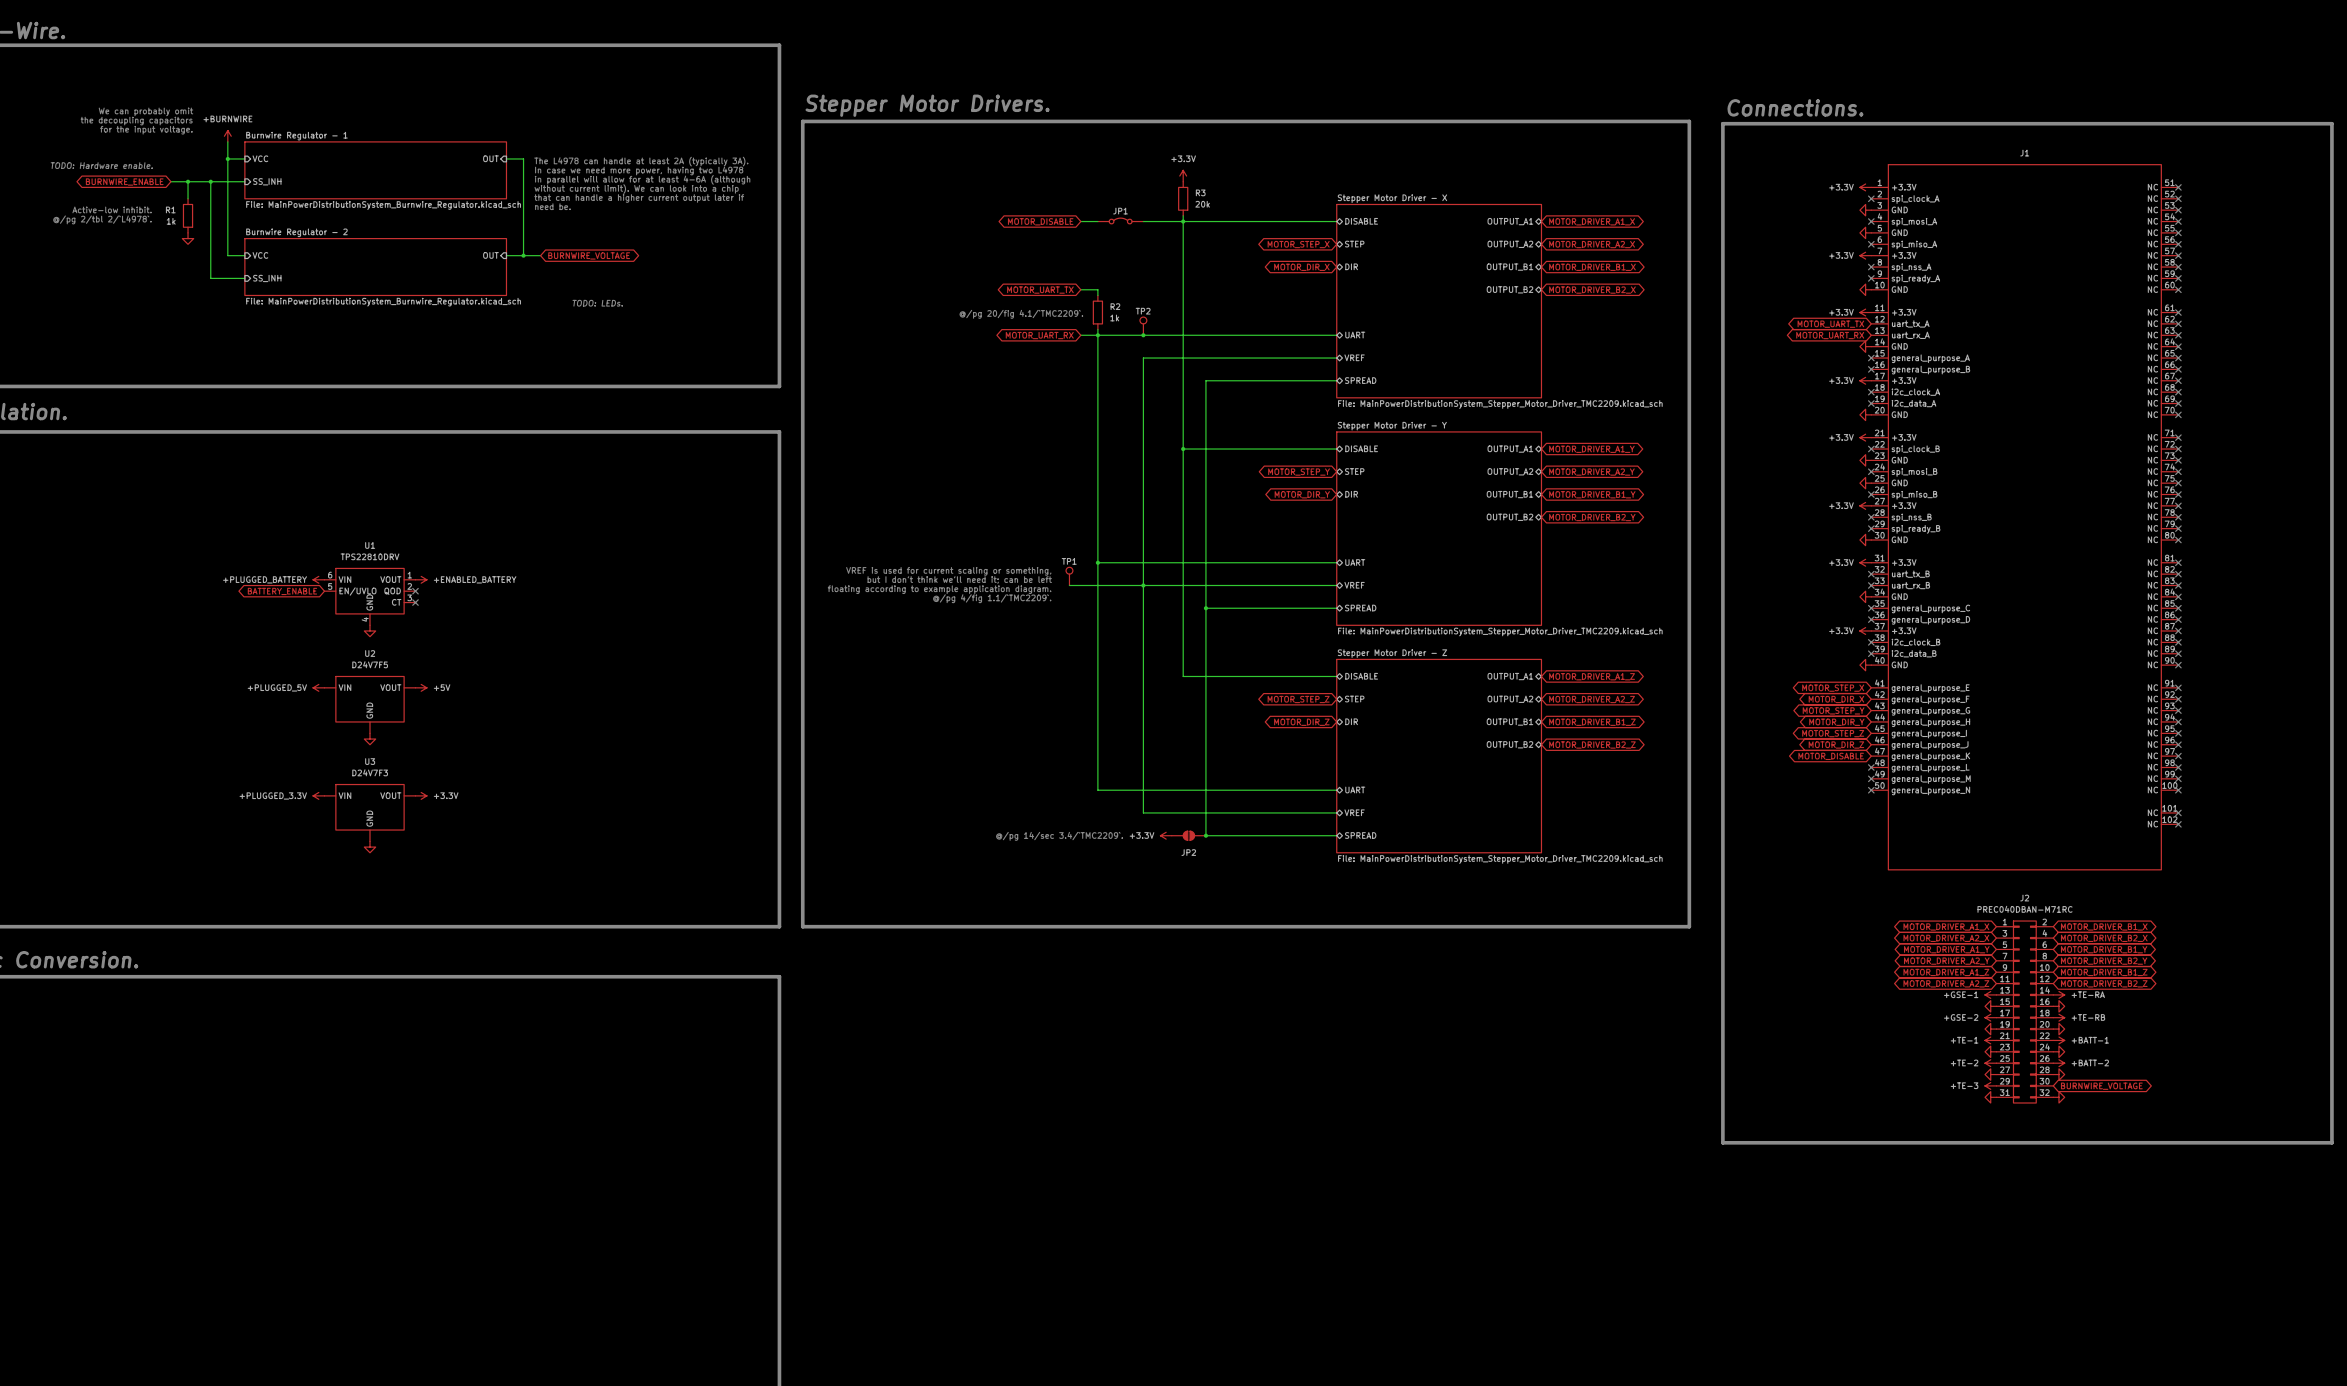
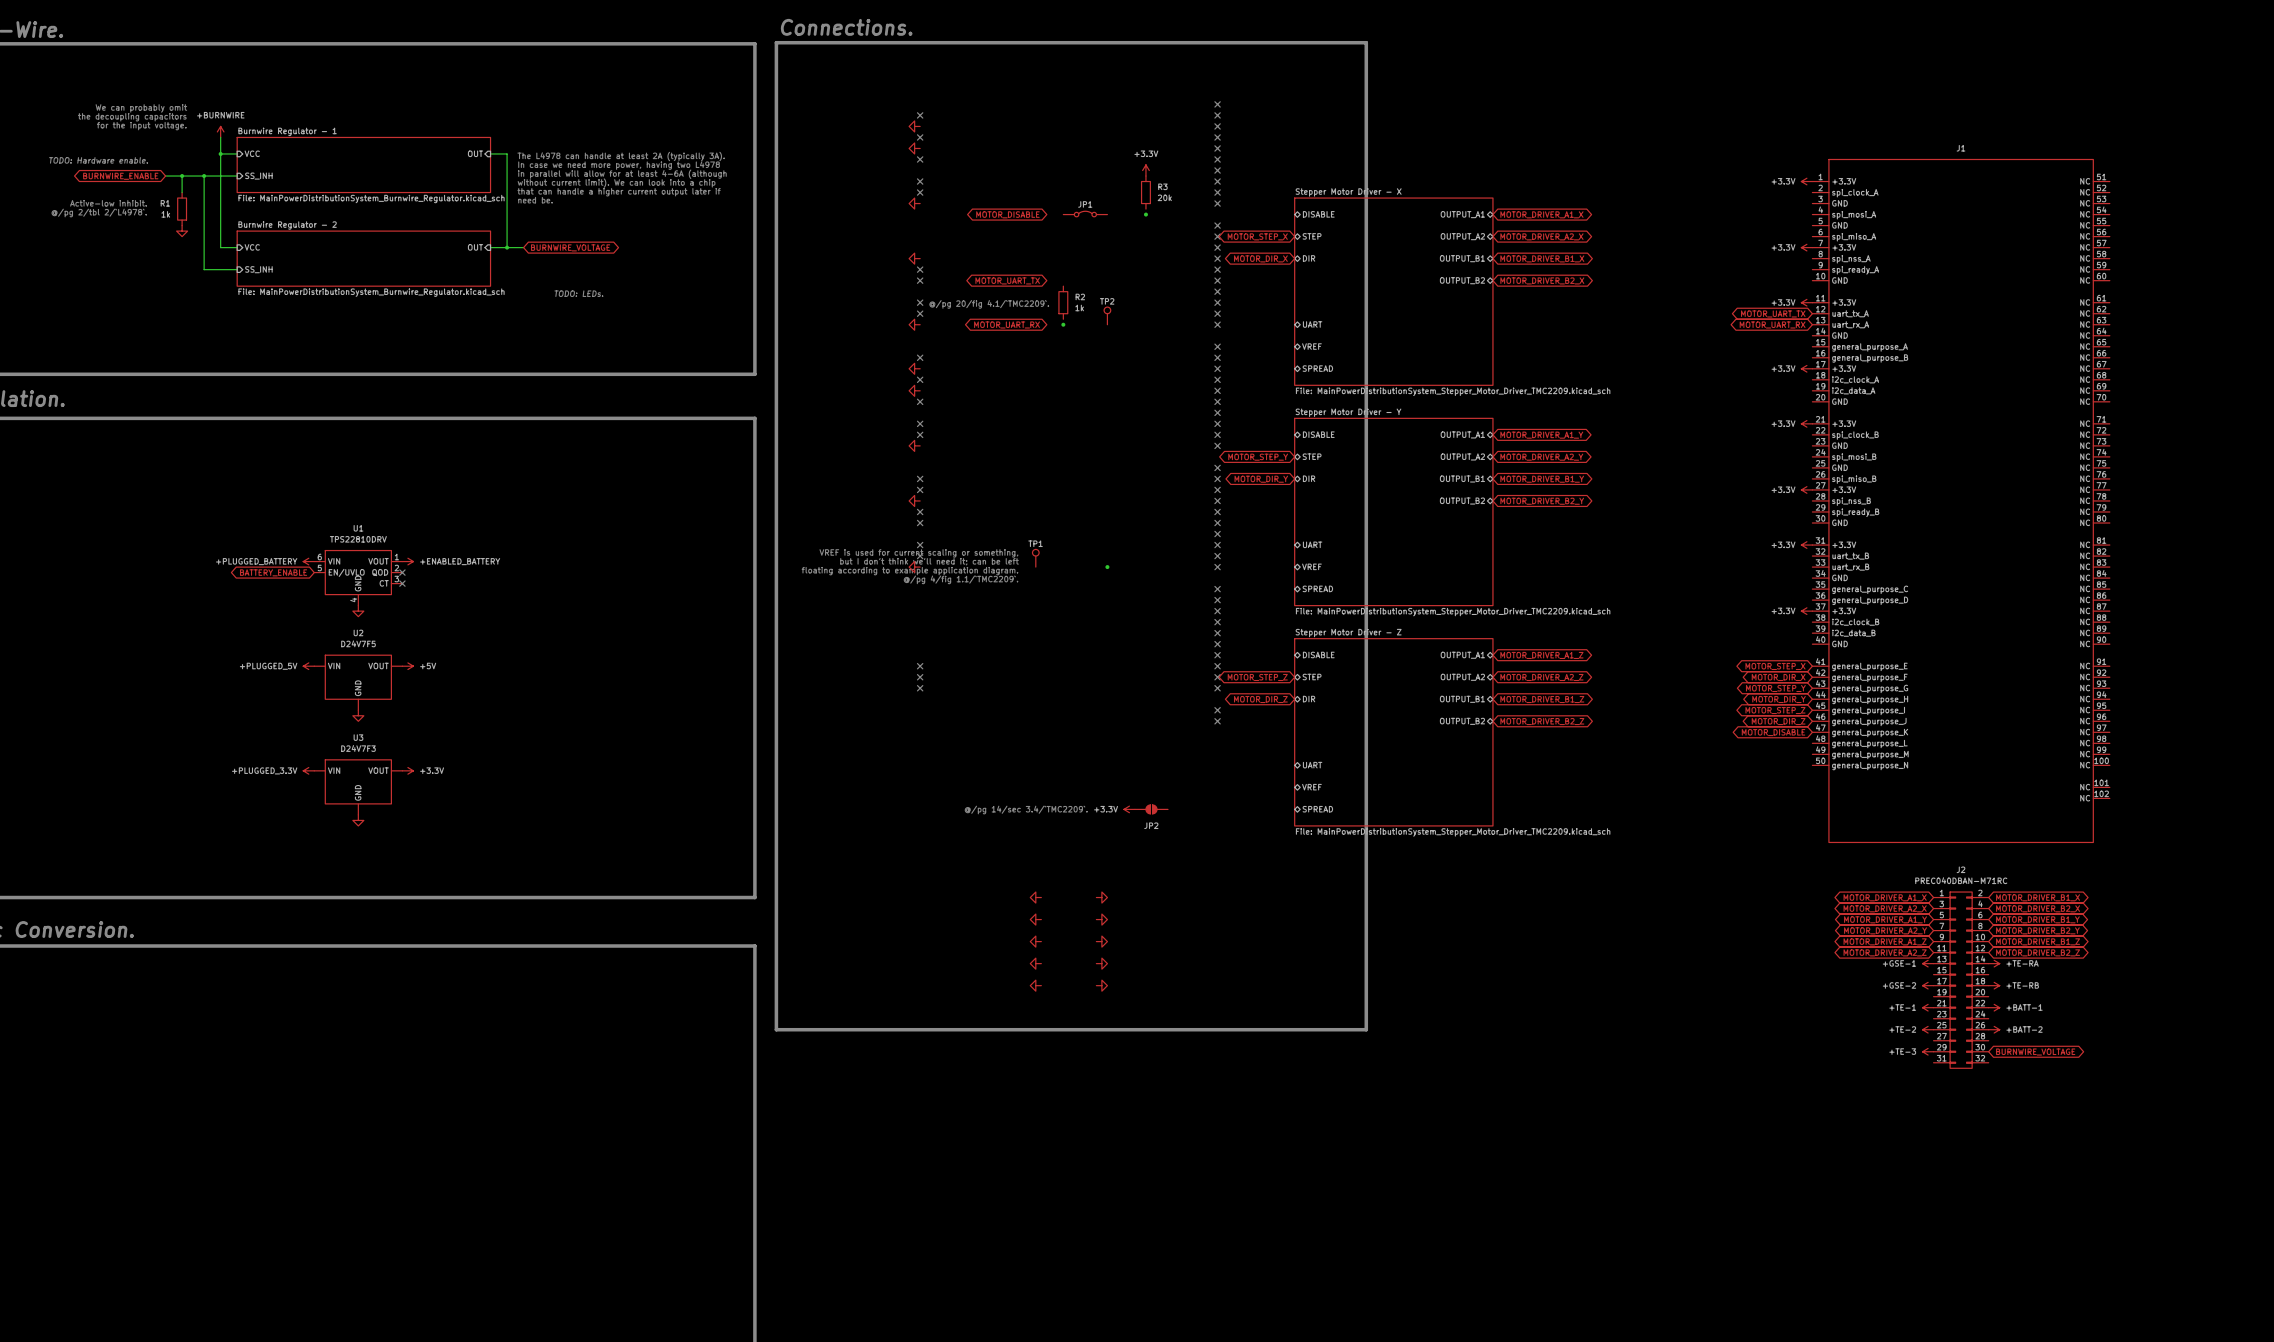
text: none -> Connections. (846, 27)
text: Stepper Motor Drivers. (927, 105) -> none
no-connect mark: none -> (1217, 104)
text: Connections. (1795, 107) -> none
no-connect mark: none -> (920, 115)
no-connect mark: none -> (1217, 115)
line: (802, 121) (1689, 121) (1689, 926) (802, 926) (802, 121) -> (776, 42) (776, 1029) (1366, 1029) (1366, 42) (776, 42)
line: (1722, 123) (2331, 123) (2331, 1142) (1722, 1142) (1722, 123) -> none
power symbol: none -> (914, 126)
no-connect mark: none -> (1217, 126)
no-connect mark: none -> (920, 137)
no-connect mark: none -> (1217, 137)
power symbol: none -> (914, 148)
no-connect mark: none -> (1217, 148)
no-connect mark: none -> (920, 159)
no-connect mark: none -> (1217, 159)
no-connect mark: none -> (1217, 170)
no-connect mark: none -> (920, 181)
no-connect mark: none -> (1217, 181)
no-connect mark: (2178, 187) -> none
no-connect mark: none -> (920, 192)
no-connect mark: none -> (1217, 192)
no-connect mark: (1871, 198) -> none
no-connect mark: (2178, 198) -> none
power symbol: none -> (914, 203)
no-connect mark: none -> (1217, 203)
power symbol: (1865, 210) -> none
no-connect mark: (2178, 210) -> none
wire: (1183, 215) (1183, 676) (1336, 676) -> none
wire: (1080, 221) (1097, 221) -> none
wire: (1143, 221) (1336, 221) -> none
no-connect mark: (1871, 221) -> none
no-connect mark: (2178, 221) -> none
no-connect mark: none -> (1217, 225)
power symbol: (1865, 232) -> none
no-connect mark: (2178, 232) -> none
no-connect mark: none -> (1217, 236)
no-connect mark: (1871, 244) -> none
no-connect mark: (2178, 244) -> none
no-connect mark: none -> (1217, 247)
no-connect mark: (2178, 255) -> none
power symbol: none -> (914, 258)
no-connect mark: none -> (1217, 258)
no-connect mark: (1871, 267) -> none
no-connect mark: (2178, 267) -> none
no-connect mark: none -> (920, 269)
no-connect mark: none -> (1217, 269)
no-connect mark: (1871, 278) -> none
no-connect mark: (2178, 278) -> none
no-connect mark: none -> (920, 280)
wire: (1080, 289) (1097, 289) (1097, 295) -> none
no-connect mark: none -> (1217, 280)
power symbol: (1865, 289) -> none
no-connect mark: (2178, 289) -> none
no-connect mark: none -> (1217, 291)
no-connect mark: none -> (920, 302)
no-connect mark: none -> (1217, 302)
no-connect mark: (2178, 312) -> none
no-connect mark: none -> (920, 313)
no-connect mark: none -> (1217, 313)
no-connect mark: (2178, 323) -> none
wire: (1097, 329) (1097, 790) (1336, 790) -> none
power symbol: none -> (914, 324)
wire: (1080, 335) (1336, 335) -> none
junction: (1143, 335) -> none
no-connect mark: none -> (1217, 324)
no-connect mark: (2178, 335) -> none
power symbol: (1865, 346) -> none
no-connect mark: (2178, 346) -> none
no-connect mark: none -> (1217, 346)
wire: (1336, 358) (1143, 358) (1143, 812) (1336, 812) -> none
no-connect mark: (1871, 358) -> none
no-connect mark: (2178, 358) -> none
no-connect mark: none -> (920, 357)
no-connect mark: none -> (1217, 357)
no-connect mark: (1871, 369) -> none
no-connect mark: (2178, 369) -> none
power symbol: none -> (914, 368)
no-connect mark: none -> (1217, 368)
wire: (1336, 380) (1205, 380) (1205, 835) (1336, 835) -> none
no-connect mark: (2178, 380) -> none
no-connect mark: none -> (920, 379)
no-connect mark: none -> (1217, 379)
no-connect mark: (1871, 392) -> none
no-connect mark: (2178, 392) -> none
power symbol: none -> (914, 390)
no-connect mark: none -> (1217, 390)
no-connect mark: (1871, 403) -> none
no-connect mark: (2178, 403) -> none
no-connect mark: none -> (920, 401)
no-connect mark: none -> (1217, 401)
power symbol: (1865, 414) -> none
no-connect mark: (2178, 414) -> none
no-connect mark: none -> (1217, 412)
no-connect mark: none -> (920, 423)
no-connect mark: none -> (1217, 423)
no-connect mark: (2178, 437) -> none
no-connect mark: none -> (920, 434)
wire: (1183, 449) (1336, 449) -> none
junction: (1183, 449) -> none
no-connect mark: none -> (1217, 434)
no-connect mark: (1871, 449) -> none
no-connect mark: (2178, 449) -> none
power symbol: none -> (914, 445)
no-connect mark: none -> (1217, 445)
power symbol: (1865, 460) -> none
no-connect mark: (2178, 460) -> none
no-connect mark: (1871, 471) -> none
no-connect mark: (2178, 471) -> none
no-connect mark: none -> (1217, 467)
power symbol: (1865, 483) -> none
no-connect mark: (2178, 483) -> none
no-connect mark: none -> (920, 478)
no-connect mark: none -> (1217, 478)
no-connect mark: (1871, 494) -> none
no-connect mark: (2178, 494) -> none
no-connect mark: none -> (920, 489)
no-connect mark: none -> (1217, 489)
no-connect mark: (2178, 505) -> none
power symbol: none -> (914, 500)
no-connect mark: none -> (1217, 500)
no-connect mark: (1871, 517) -> none
no-connect mark: (2178, 517) -> none
no-connect mark: none -> (920, 511)
no-connect mark: none -> (1217, 511)
no-connect mark: (1871, 528) -> none
no-connect mark: (2178, 528) -> none
no-connect mark: none -> (920, 523)
no-connect mark: none -> (1217, 523)
power symbol: (1865, 540) -> none
no-connect mark: (2178, 540) -> none
no-connect mark: none -> (1217, 534)
no-connect mark: none -> (920, 545)
wire: (1097, 562) (1336, 562) -> none
junction: (1097, 562) -> none
no-connect mark: none -> (1217, 545)
no-connect mark: (2178, 562) -> none
no-connect mark: none -> (920, 556)
no-connect mark: none -> (1217, 556)
no-connect mark: (1871, 574) -> none
no-connect mark: (2178, 574) -> none
power symbol: none -> (914, 567)
wire: (1069, 585) (1336, 585) -> none
no-connect mark: none -> (1217, 567)
no-connect mark: (1871, 585) -> none
no-connect mark: (2178, 585) -> none
power symbol: (1865, 596) -> none
no-connect mark: (2178, 596) -> none
wire: (1205, 608) (1336, 608) -> none
junction: (1205, 608) -> none
no-connect mark: none -> (1217, 589)
no-connect mark: (1871, 608) -> none
no-connect mark: (2178, 608) -> none
no-connect mark: none -> (1217, 600)
no-connect mark: (1871, 619) -> none
no-connect mark: (2178, 619) -> none
no-connect mark: none -> (1217, 611)
no-connect mark: (2178, 630) -> none
no-connect mark: none -> (1217, 622)
no-connect mark: (1871, 642) -> none
no-connect mark: (2178, 642) -> none
no-connect mark: none -> (1217, 633)
no-connect mark: (1871, 653) -> none
no-connect mark: (2178, 653) -> none
no-connect mark: none -> (1217, 644)
power symbol: (1865, 665) -> none
no-connect mark: (2178, 665) -> none
no-connect mark: none -> (1217, 655)
no-connect mark: none -> (920, 666)
no-connect mark: none -> (1217, 666)
no-connect mark: (2178, 687) -> none
no-connect mark: none -> (920, 677)
no-connect mark: none -> (1217, 677)
no-connect mark: (2178, 699) -> none
no-connect mark: none -> (920, 688)
no-connect mark: none -> (1217, 688)
no-connect mark: (2178, 710) -> none
no-connect mark: (2178, 721) -> none
no-connect mark: none -> (1217, 710)
no-connect mark: (2178, 733) -> none
no-connect mark: none -> (1217, 721)
no-connect mark: (2178, 744) -> none
no-connect mark: (2178, 756) -> none
no-connect mark: (1871, 767) -> none
no-connect mark: (2178, 767) -> none
no-connect mark: (1871, 778) -> none
no-connect mark: (2178, 778) -> none
no-connect mark: (1871, 790) -> none
no-connect mark: (2178, 790) -> none
no-connect mark: (2178, 812) -> none
no-connect mark: (2178, 824) -> none
junction: (1205, 835) -> none
power symbol: none -> (1035, 897)
power symbol: none -> (1101, 897)
power symbol: none -> (1035, 919)
power symbol: none -> (1101, 919)
power symbol: none -> (1035, 941)
power symbol: none -> (1101, 941)
power symbol: none -> (1035, 963)
power symbol: none -> (1101, 963)
power symbol: (1990, 1006) -> none
power symbol: (2058, 1006) -> none
power symbol: none -> (1035, 985)
power symbol: none -> (1101, 985)
power symbol: (1990, 1029) -> none
power symbol: (2058, 1029) -> none
power symbol: (1990, 1051) -> none
power symbol: (2058, 1051) -> none
power symbol: (1990, 1074) -> none
power symbol: (2058, 1074) -> none
power symbol: (1990, 1097) -> none
power symbol: (2058, 1097) -> none

